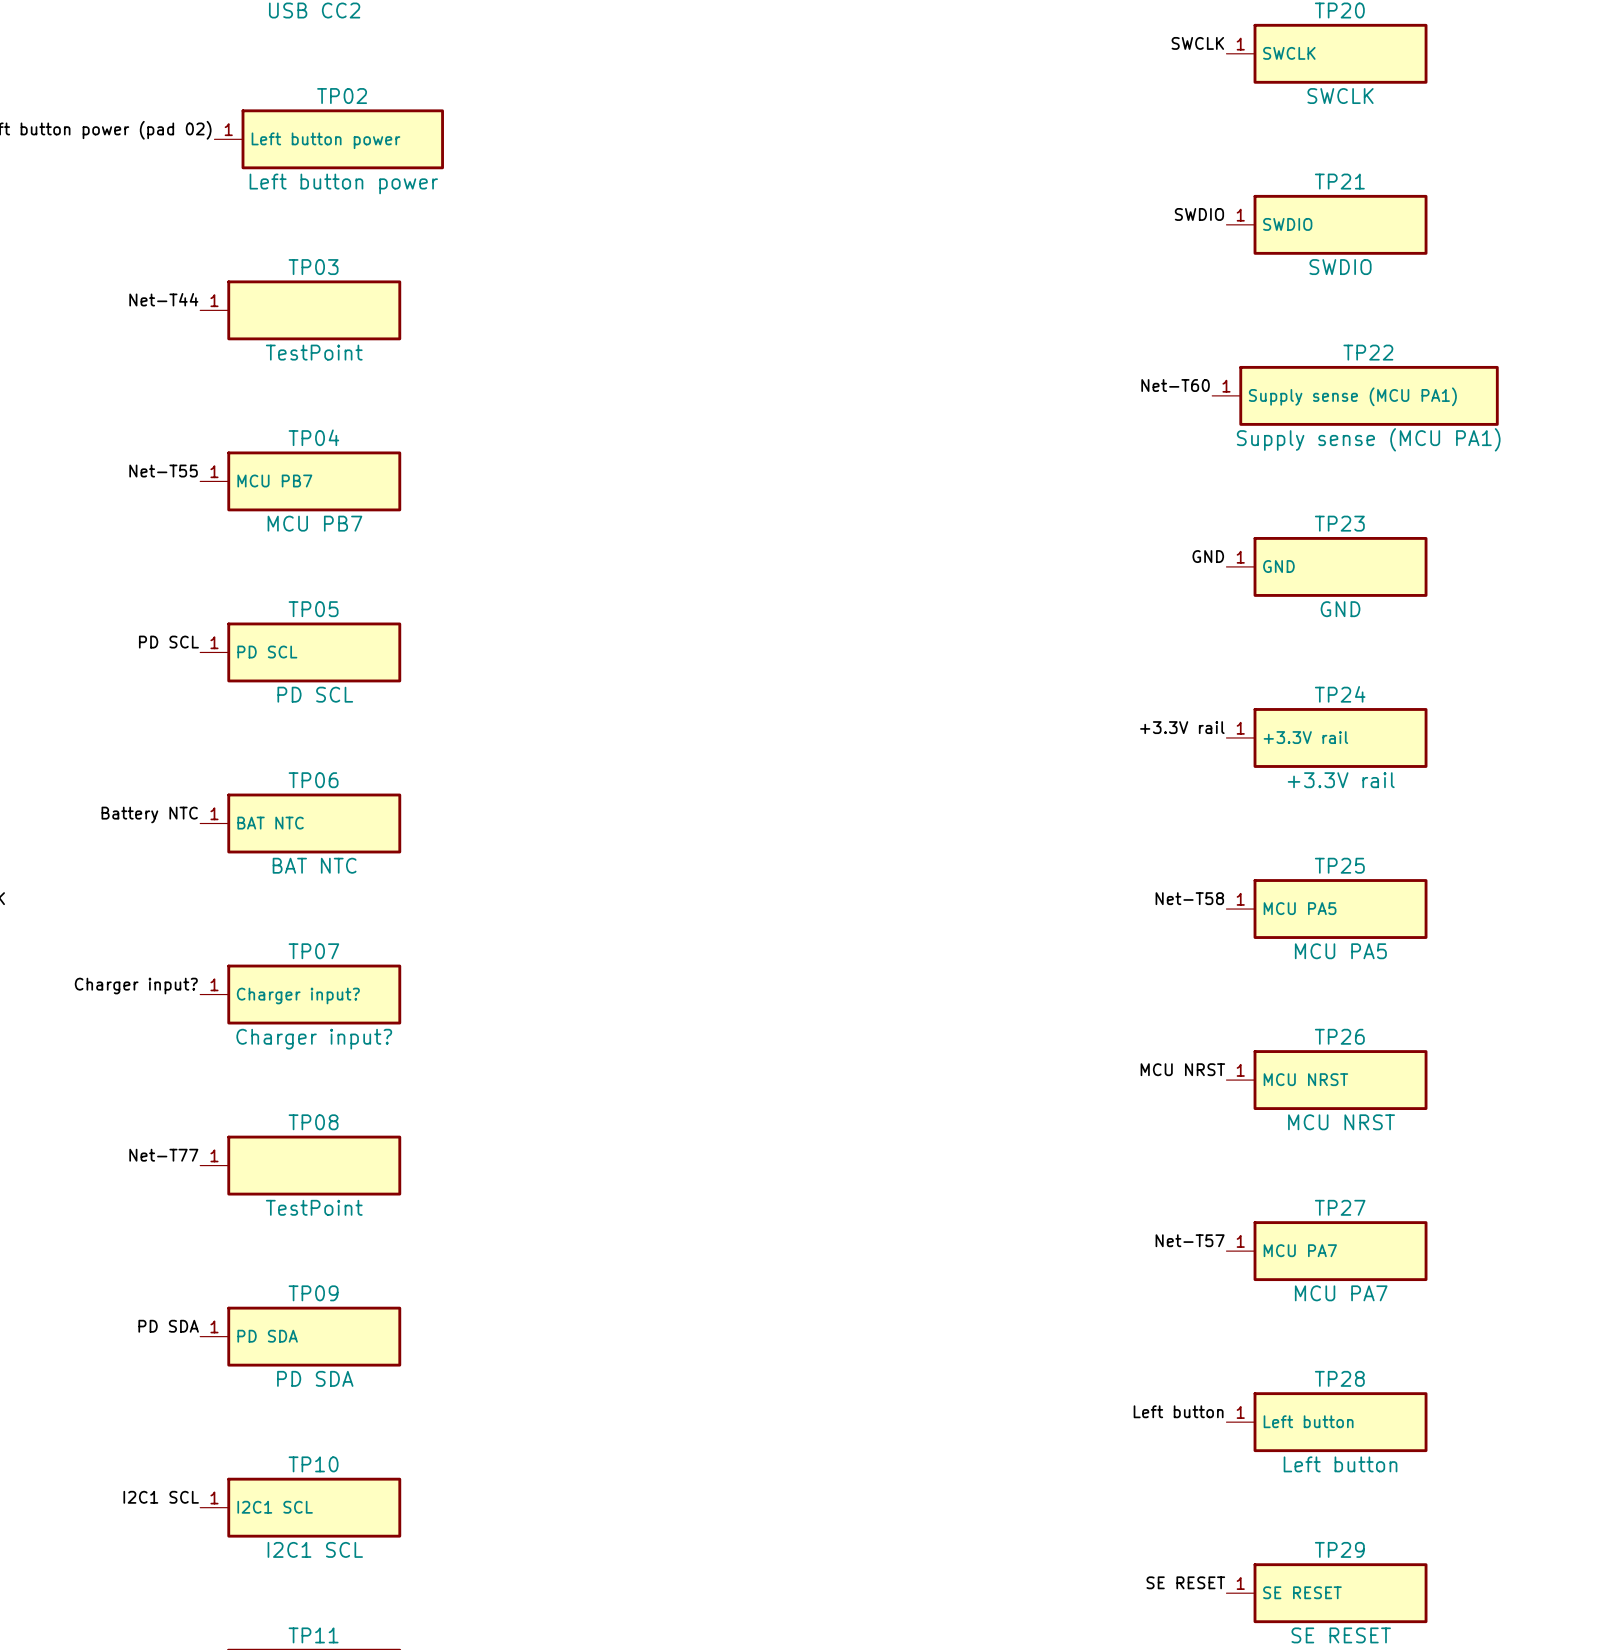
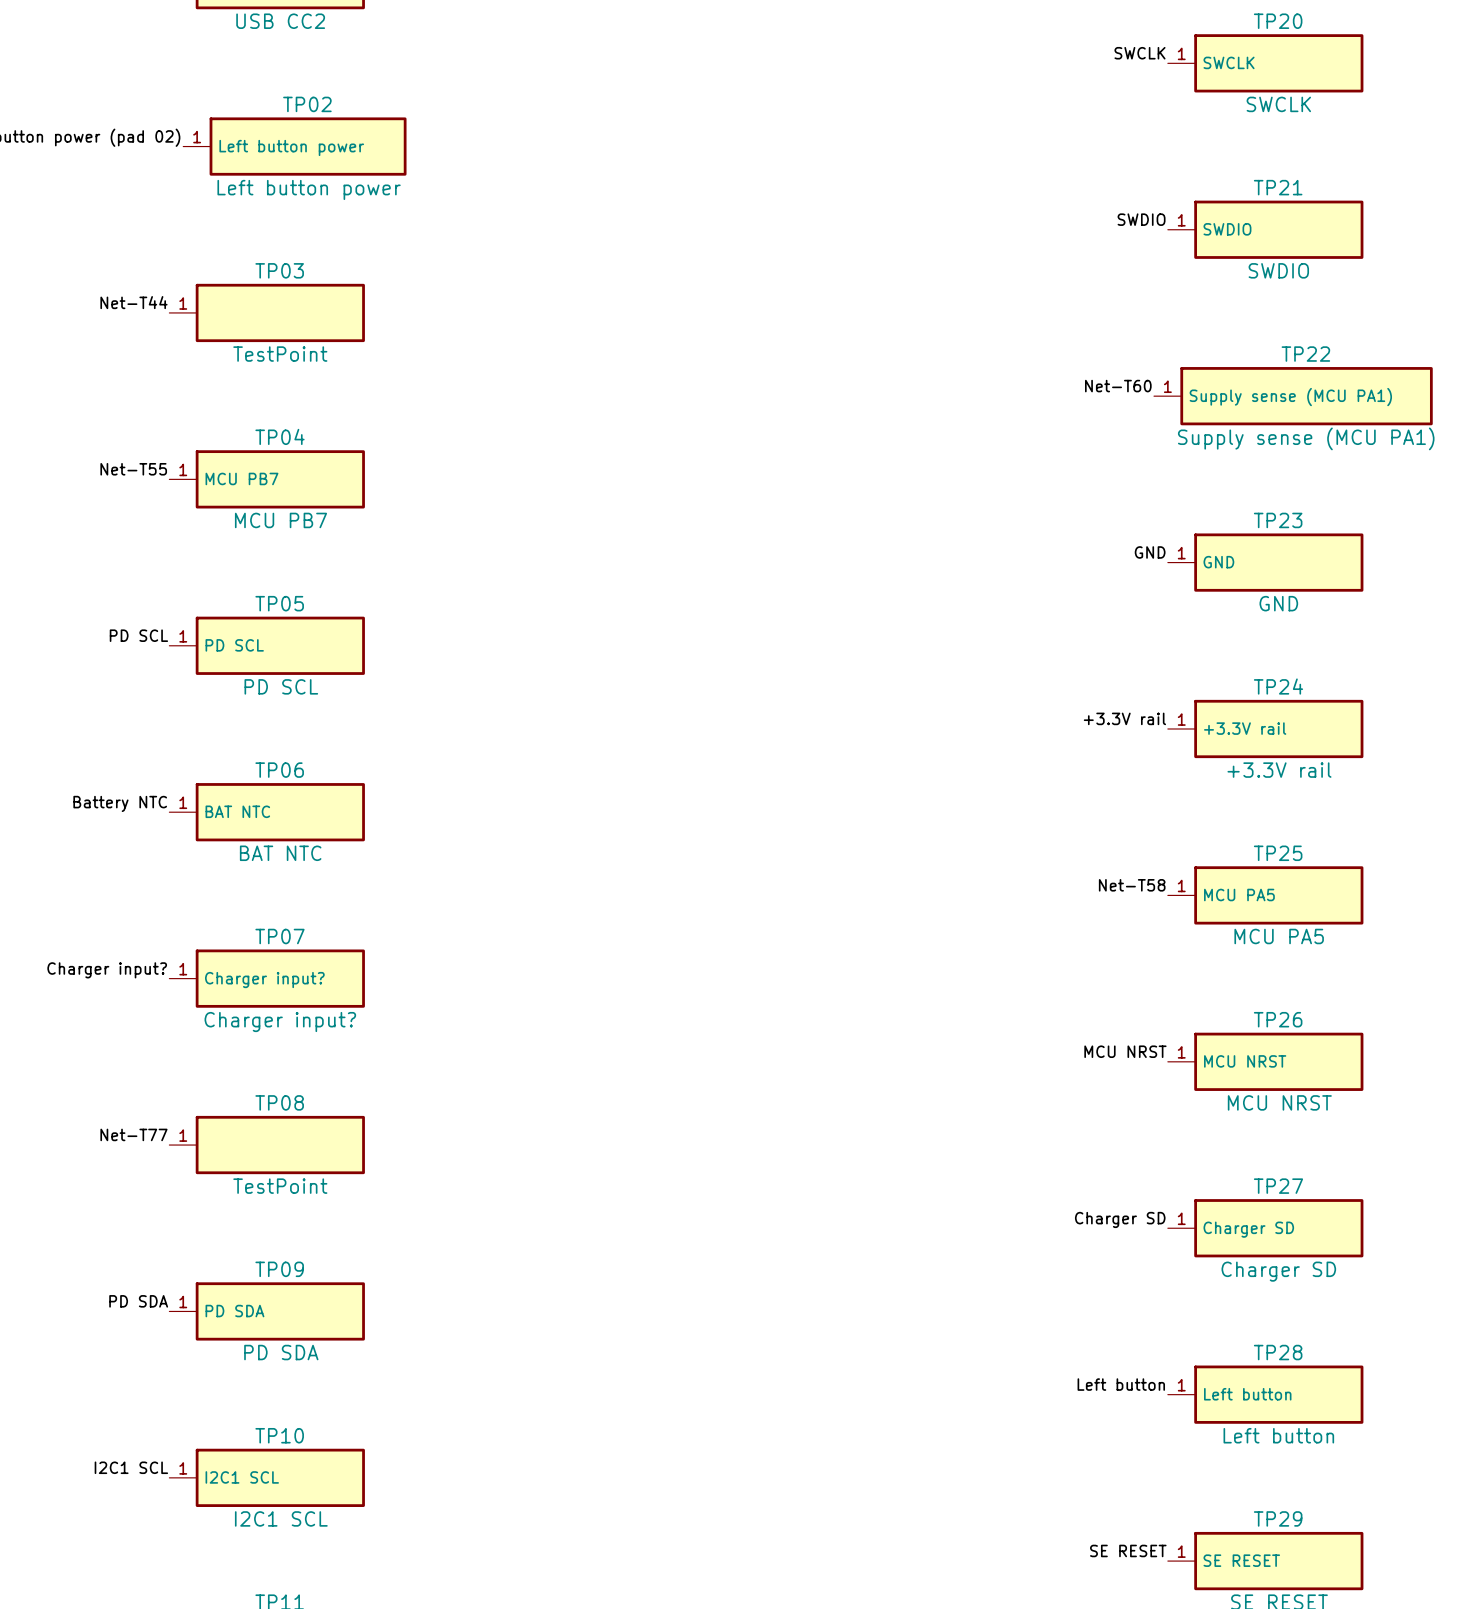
label: Net-T57 (1190, 1240) -> Charger SD (1120, 1219)
TP27 pin name: MCU PA7 (1300, 1250) -> Charger SD (1248, 1229)
TP27 value: MCU PA7 (1341, 1293) -> Charger SD (1278, 1271)

